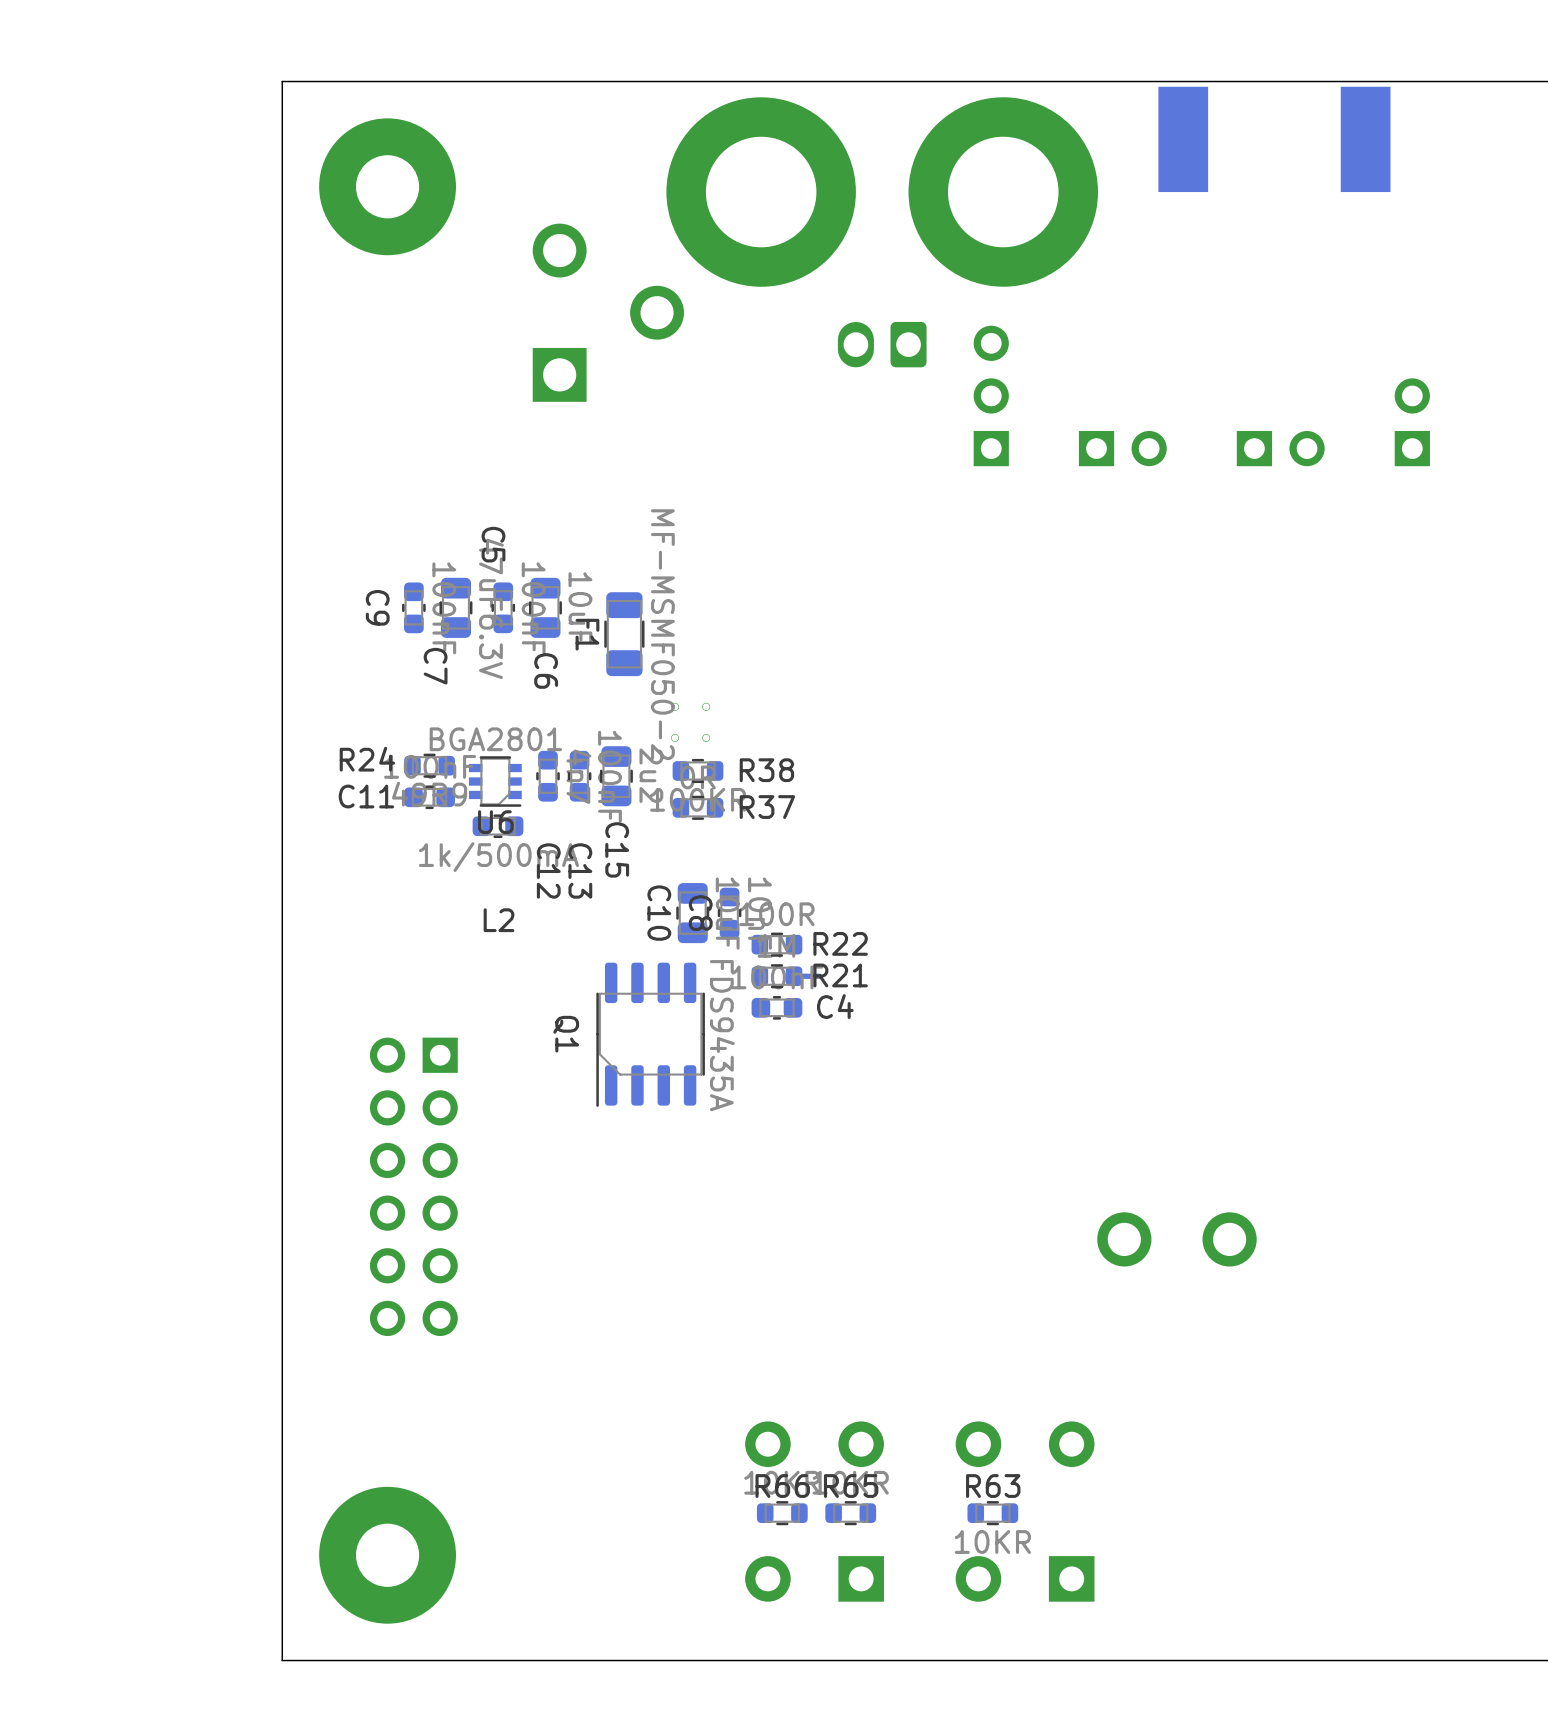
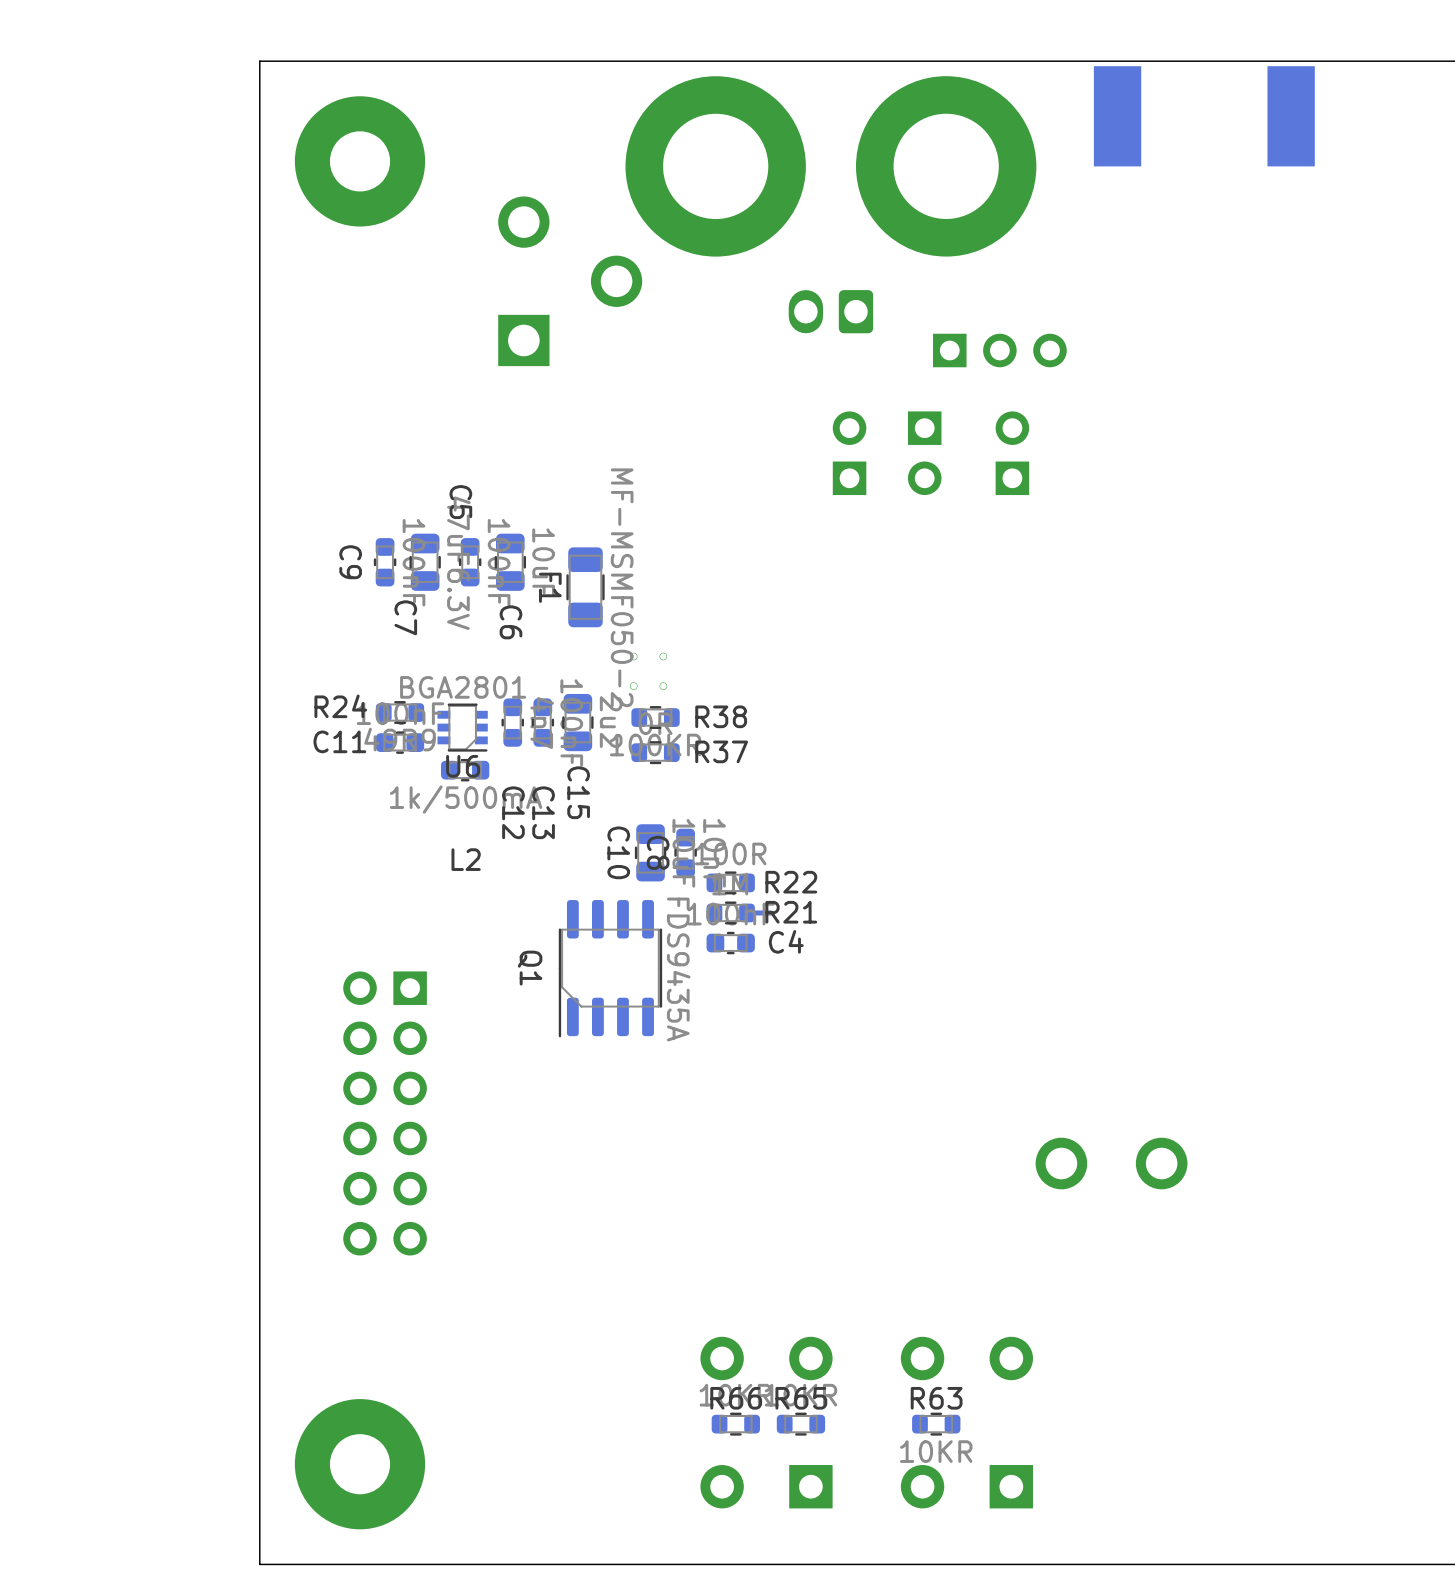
part rotation: 0° (991, 395) -> 90° clockwise (999, 350)
part: (1412, 422) -> none
part rotation: 0° (1122, 448) -> 90° counterclockwise (1012, 453)
part position: (1122, 448) -> (1012, 453)
part: (1280, 448) -> none
part: none -> (849, 453)
part: none -> (924, 453)

